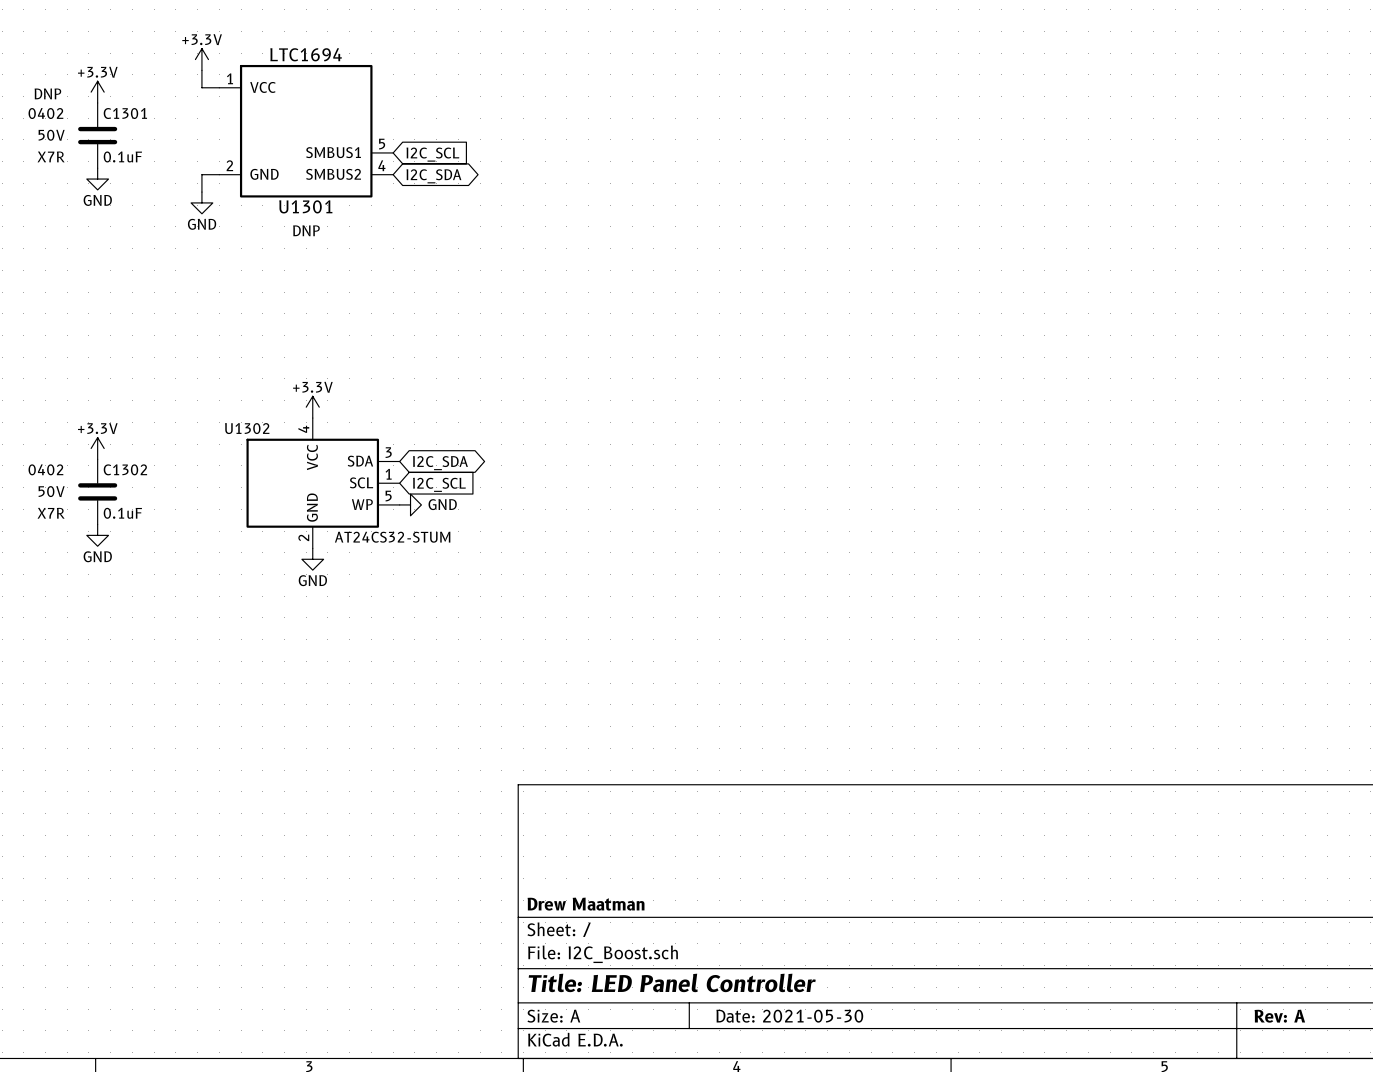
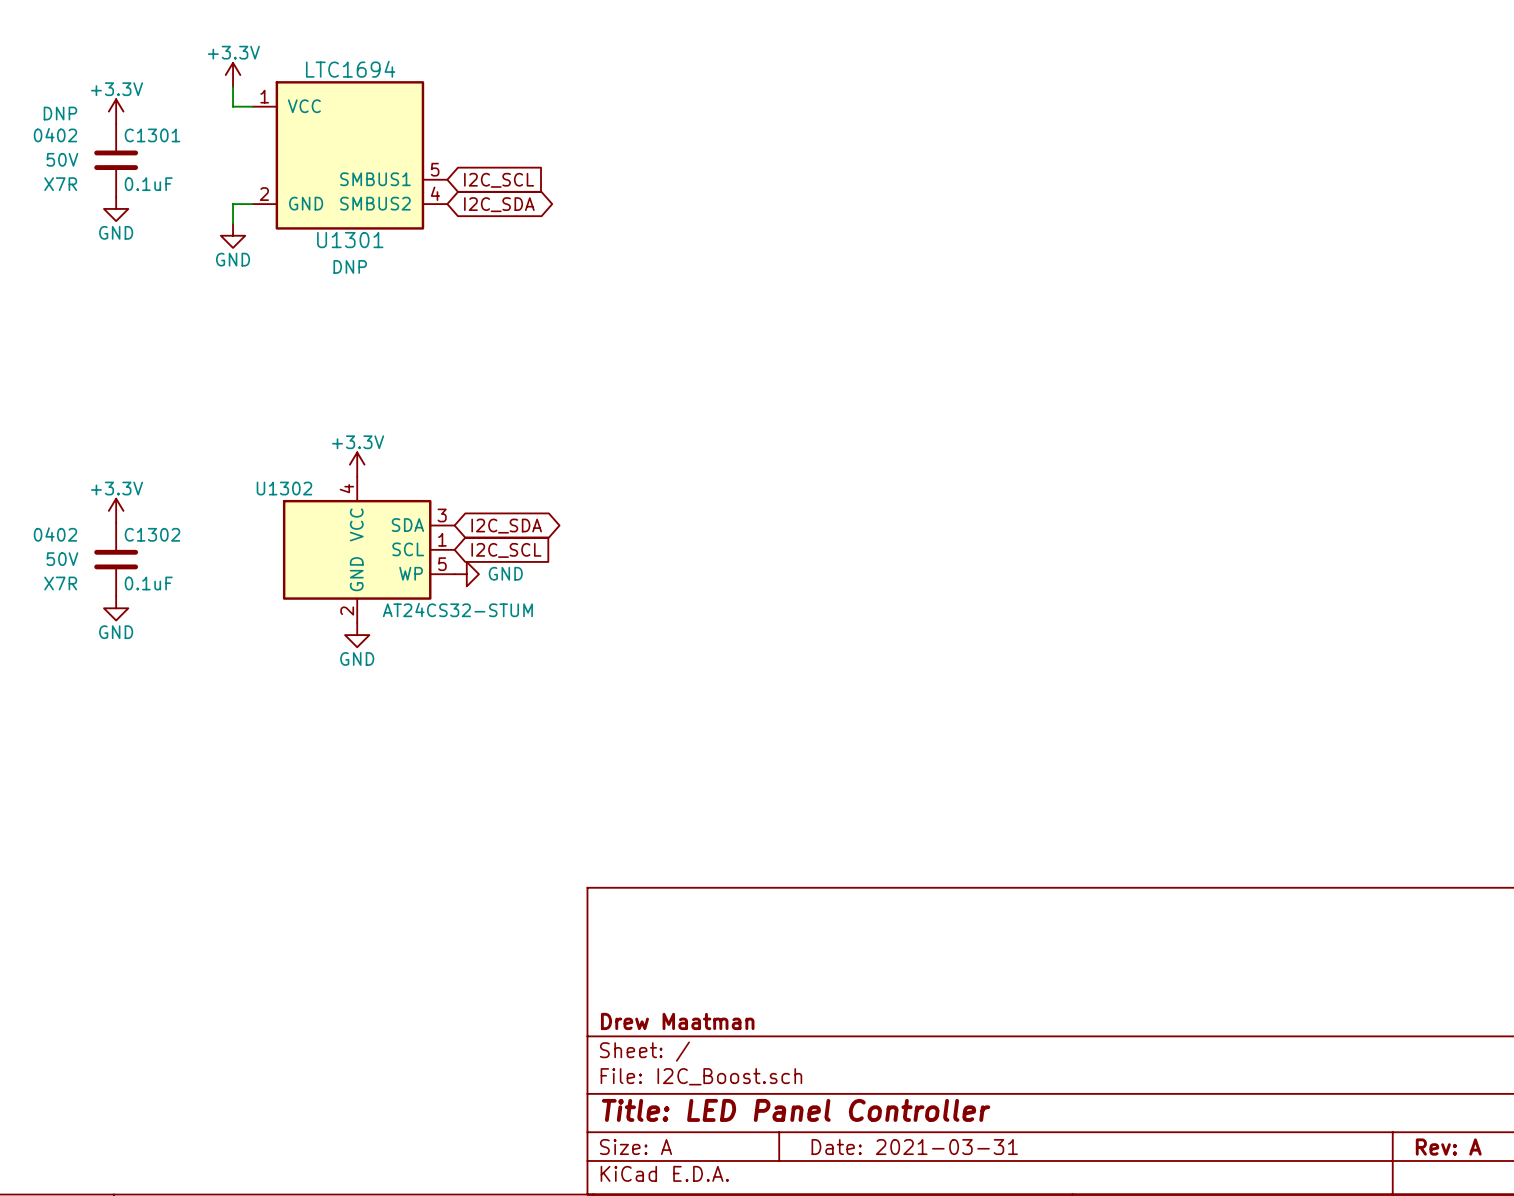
title block: Date: 2021-05-30 (789, 1016) -> Date: 2021-03-31 (914, 1147)

